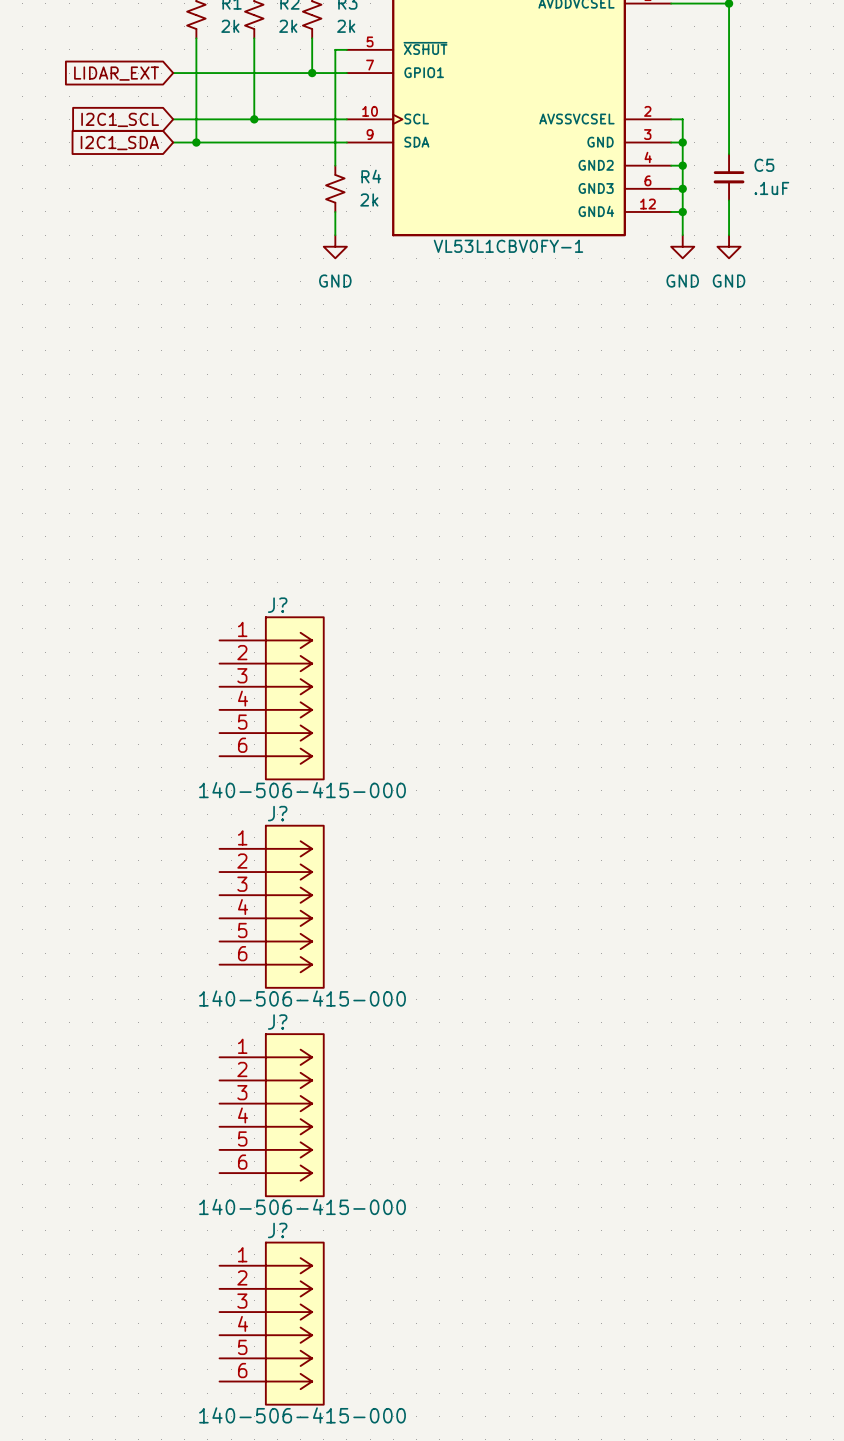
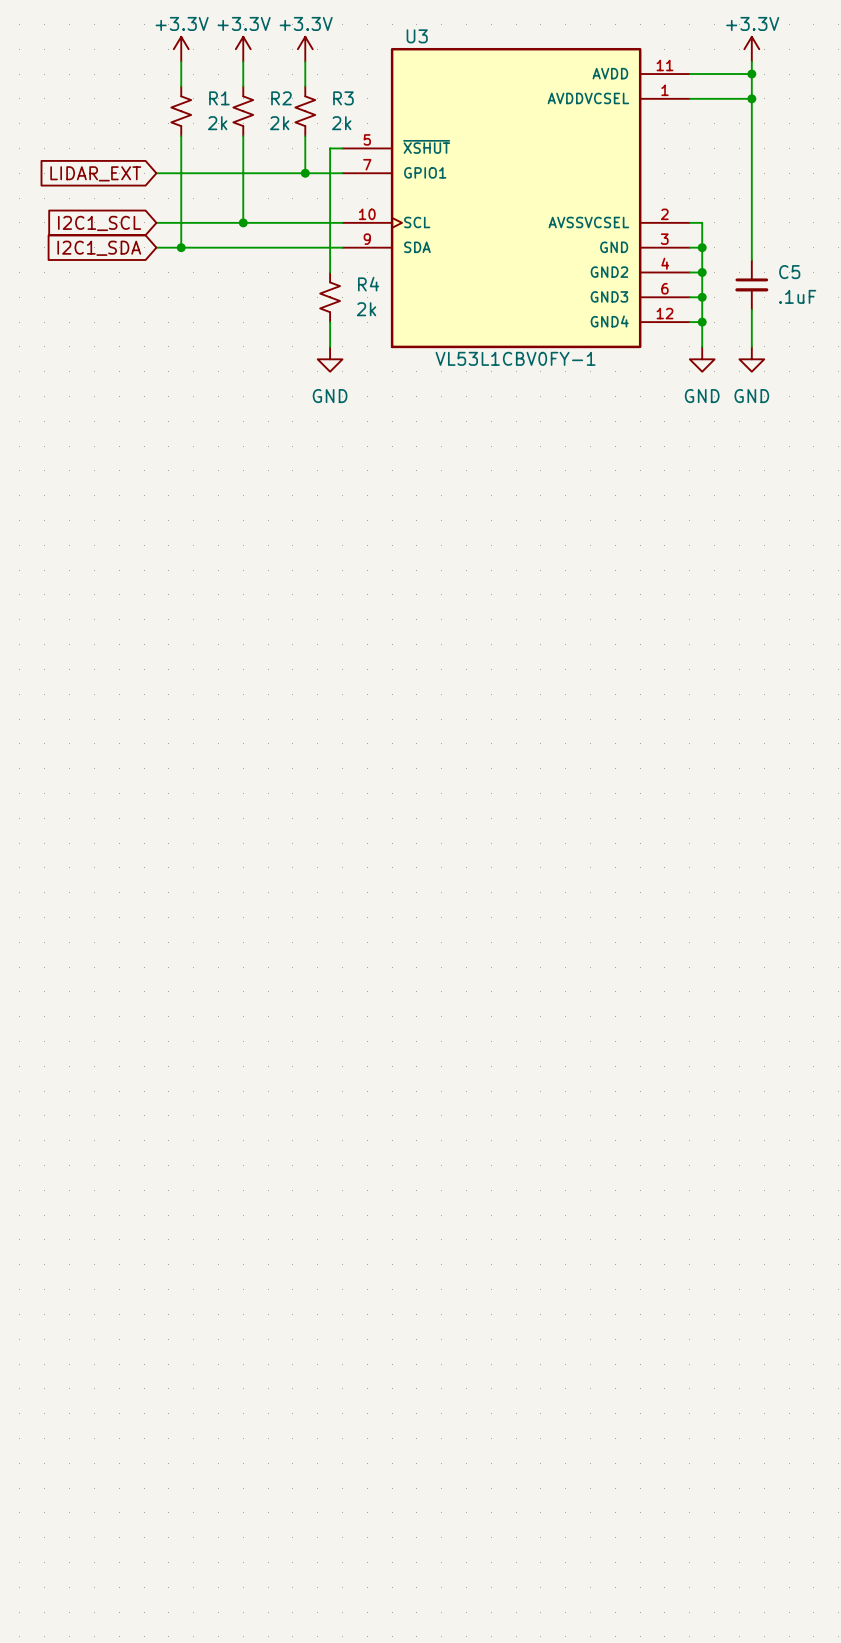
J?: 140-506-415-000 (271, 698) -> none
J?: 140-506-415-000 (271, 906) -> none
J?: 140-506-415-000 (271, 1115) -> none
J?: 140-506-415-000 (271, 1323) -> none

